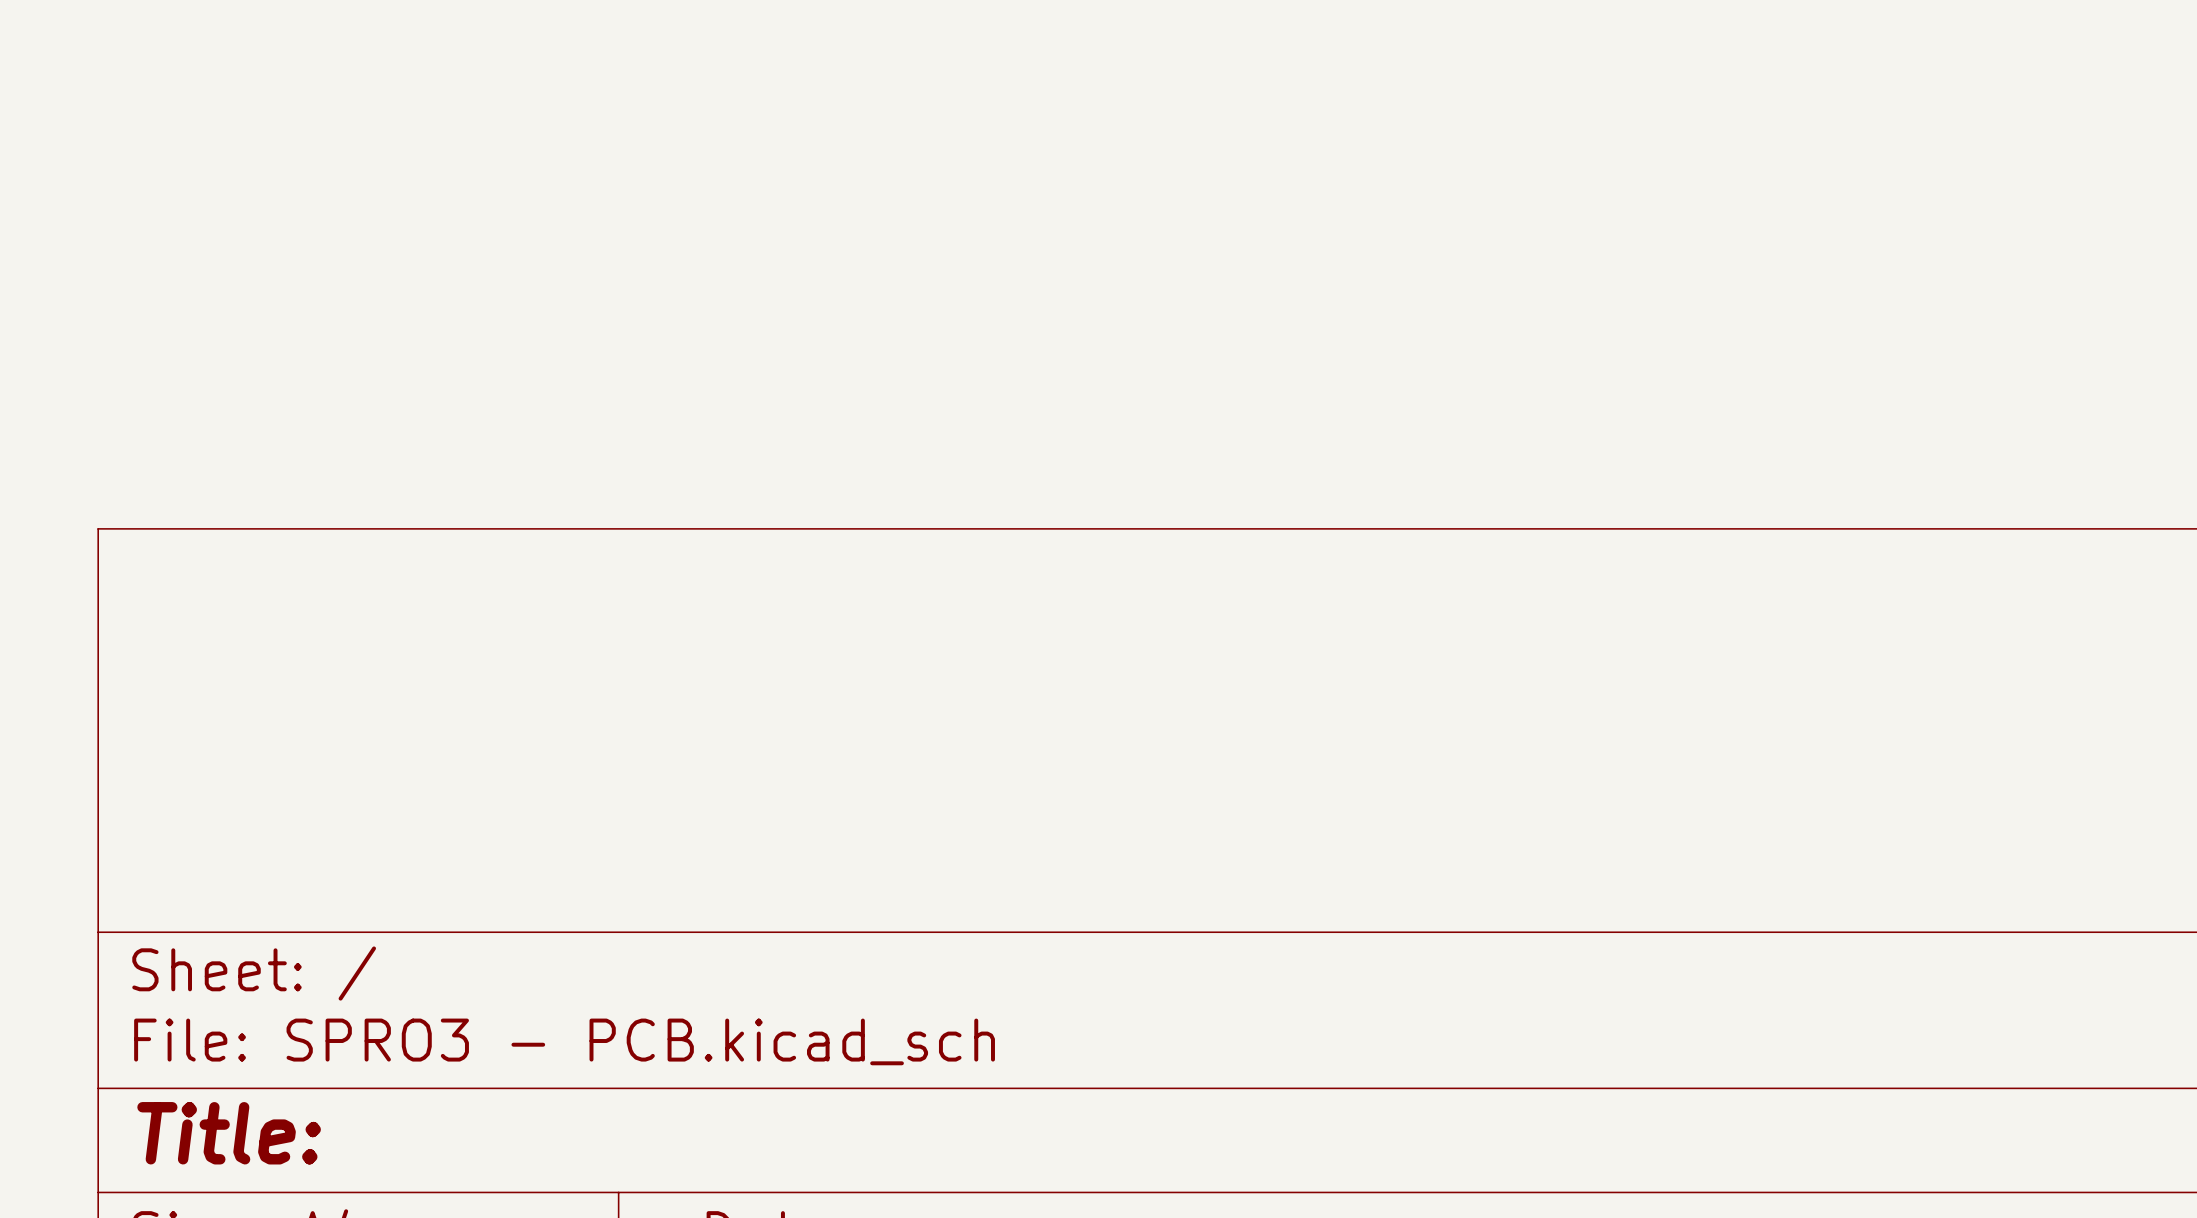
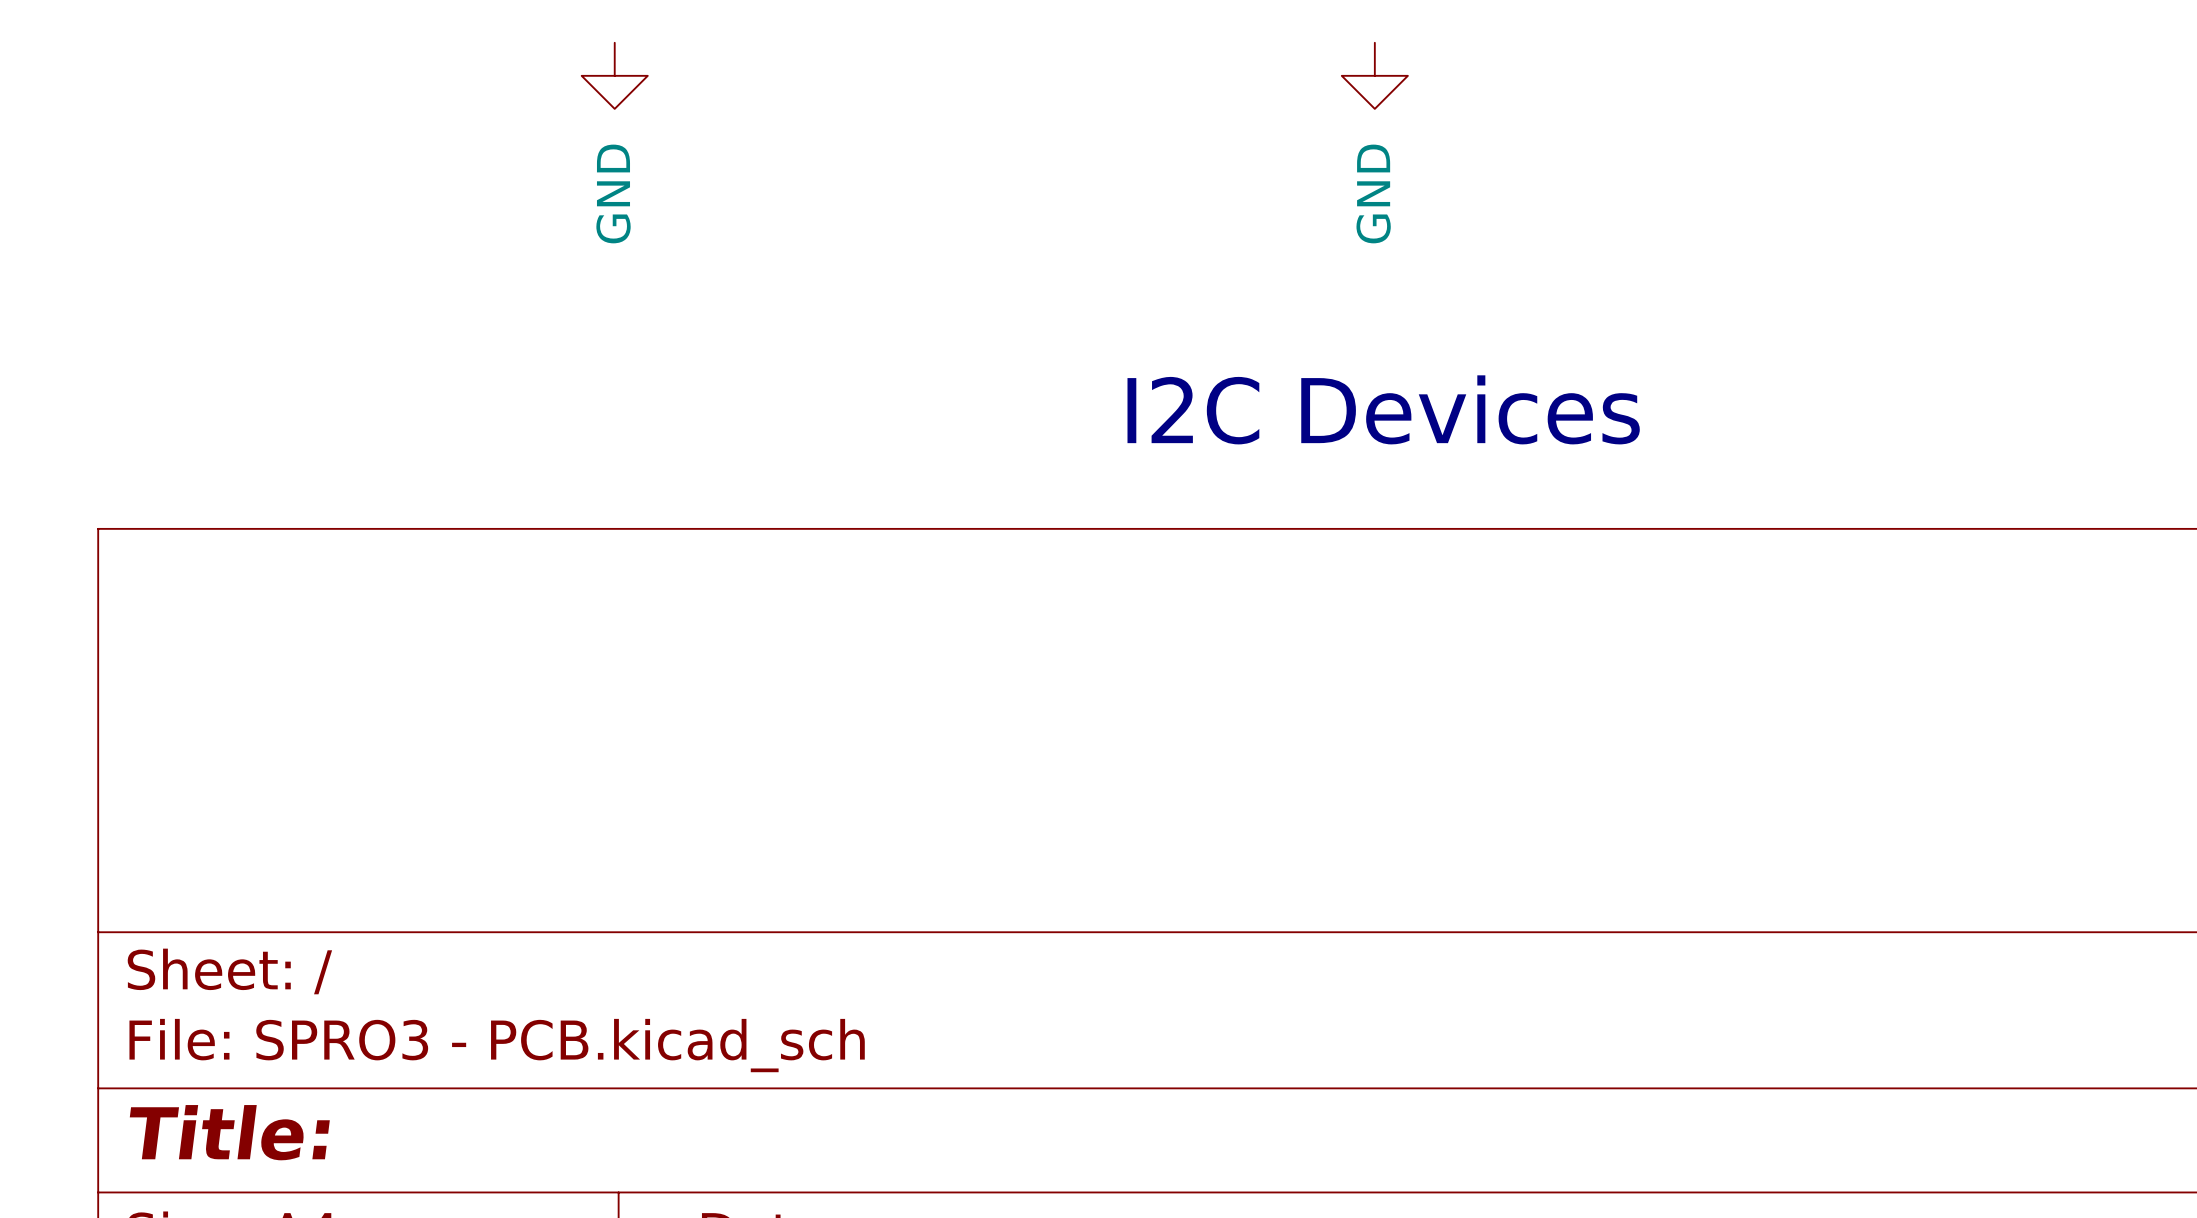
power symbol: none -> GND (614, 75)
power symbol: none -> GND (1374, 75)
text: none -> I2C Devices (1383, 409)

